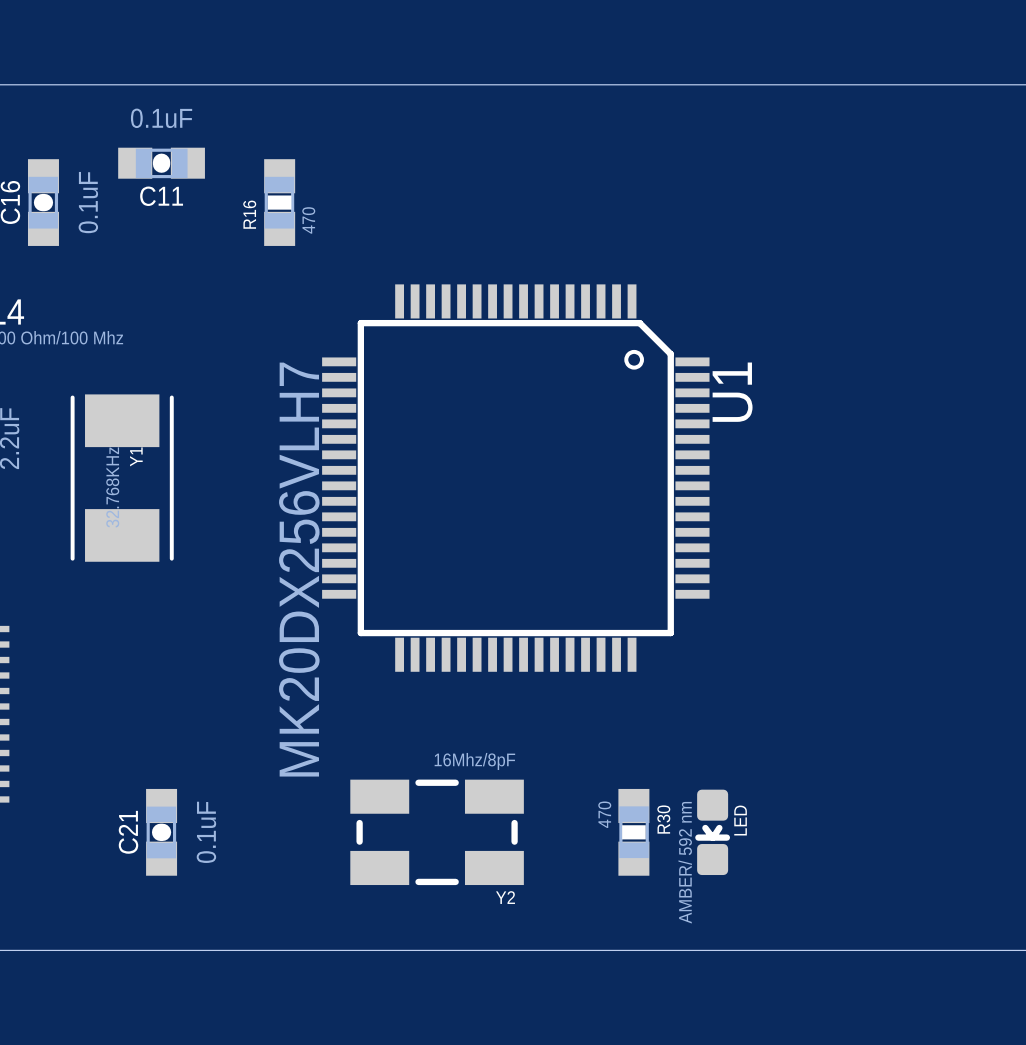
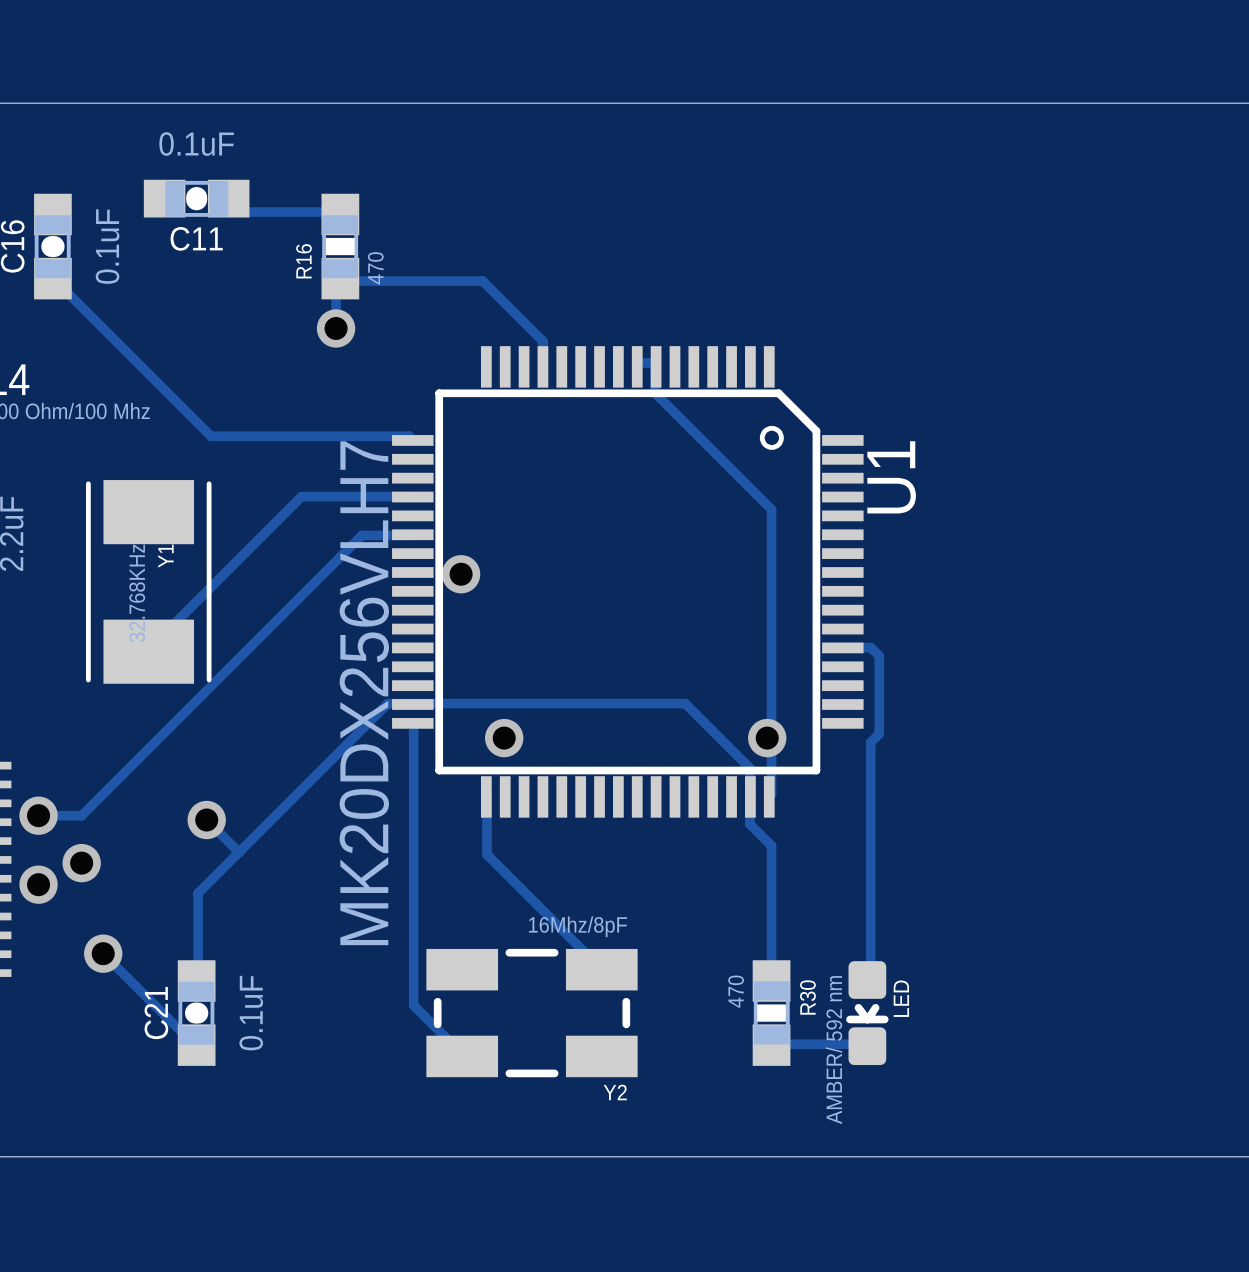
track: none -> (228, 198) (232, 199) (245, 212) (340, 212) (340, 214)
track: none -> (52, 278) (211, 436) (409, 436) (412, 440)
track: none -> (336, 328) (336, 281) (340, 278) (340, 281) (482, 281) (543, 341) (542, 366)
via: none -> (336, 328)
track: none -> (637, 366) (637, 362) (655, 362) (655, 393) (771, 509) (771, 794) (769, 796)
track: none -> (412, 497) (301, 496) (150, 647) (148, 651)
track: none -> (412, 534) (361, 535) (81, 815) (38, 815)
via: none -> (461, 574)
track: none -> (842, 647) (870, 647) (879, 656) (879, 733) (870, 742) (870, 979) (867, 979)
track: none -> (412, 723) (413, 1005) (461, 1052) (462, 1056)
via: none -> (504, 738)
via: none -> (767, 738)
track: none -> (486, 796) (486, 854) (601, 969)
via: none -> (38, 815)
track: none -> (206, 820) (239, 852)
via: none -> (206, 820)
via: none -> (81, 863)
via: none -> (38, 884)
track: none -> (103, 953) (196, 1045)
via: none -> (103, 953)
track: none -> (196, 981) (198, 893) (387, 703) (685, 703) (749, 768) (749, 824) (771, 845) (771, 981)
track: none -> (771, 1045) (866, 1044) (867, 1046)

